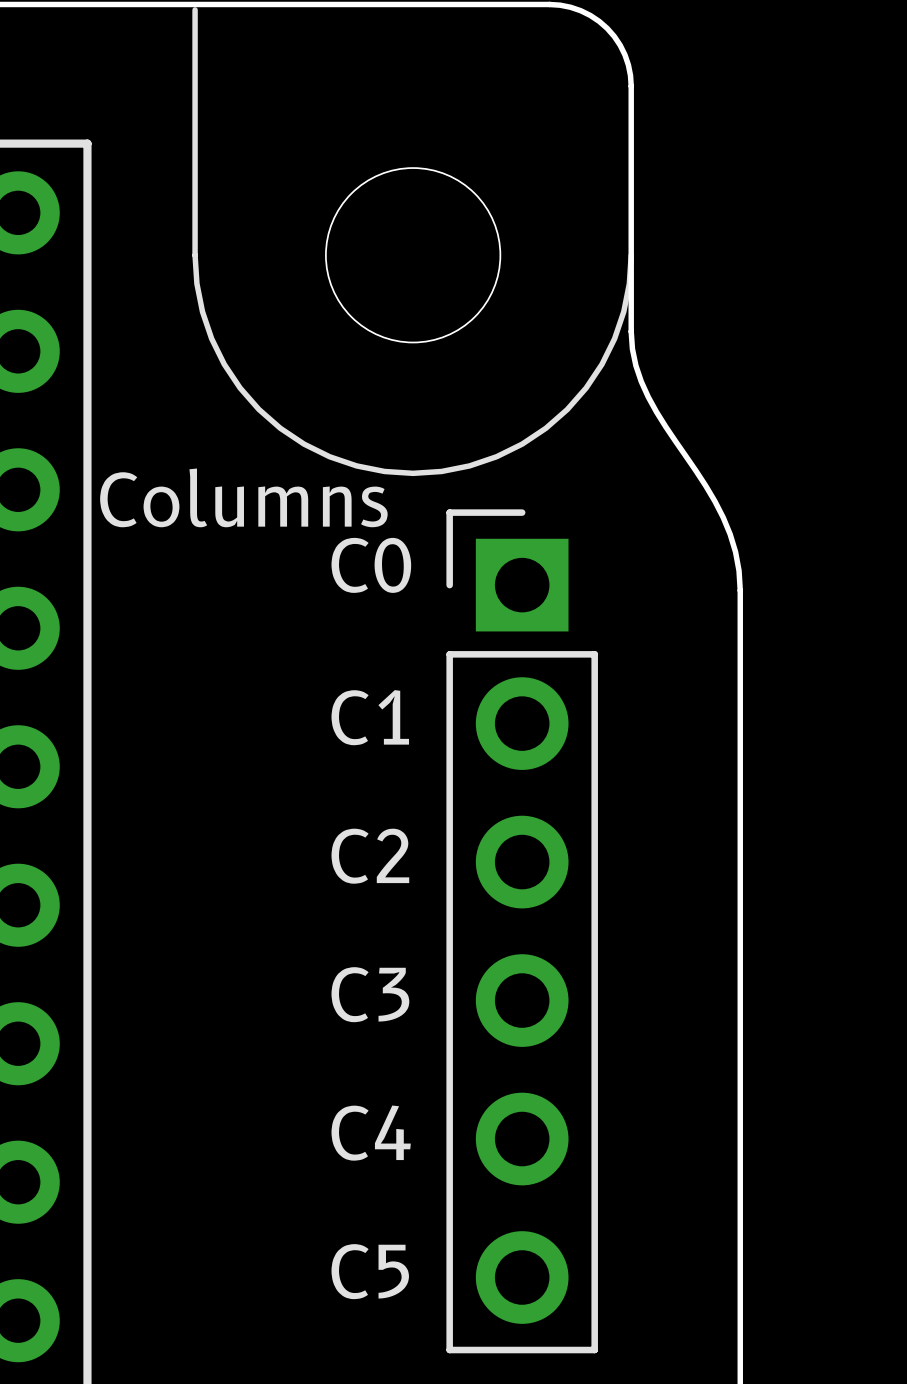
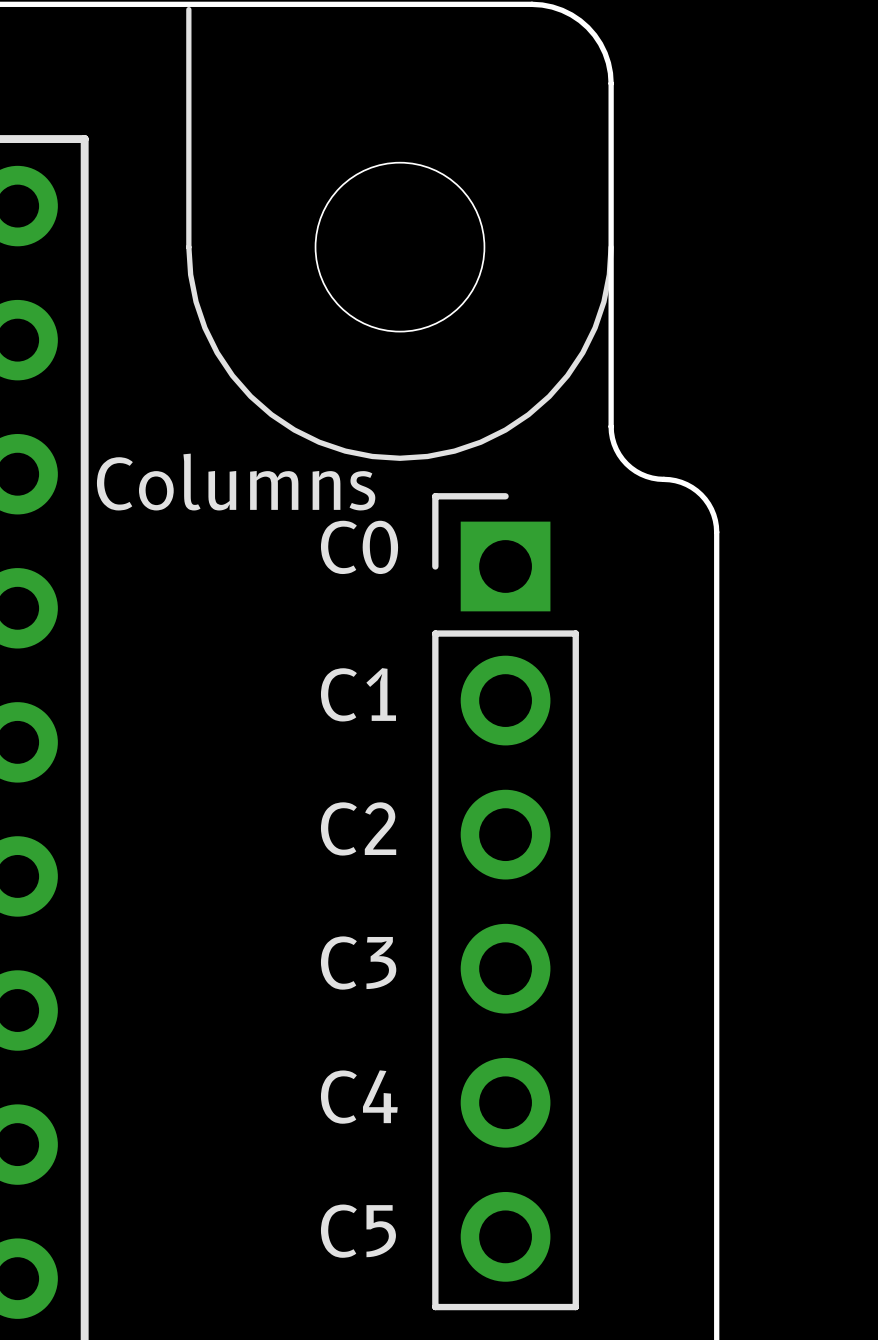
board edge: (631, 331) (635, 365) (648, 396) (705, 485) (723, 517) (735, 552) (740, 590) -> (611, 321) (611, 426) (616, 449) (622, 459) (635, 471) (652, 478) (681, 482) (692, 487) (705, 499) (713, 514) (716, 526) (716, 571)

